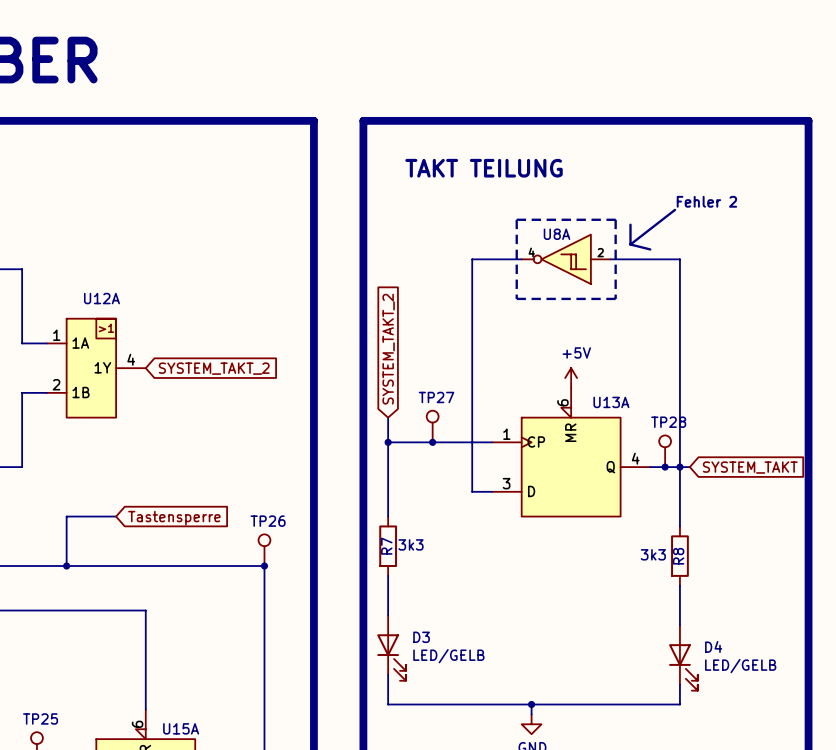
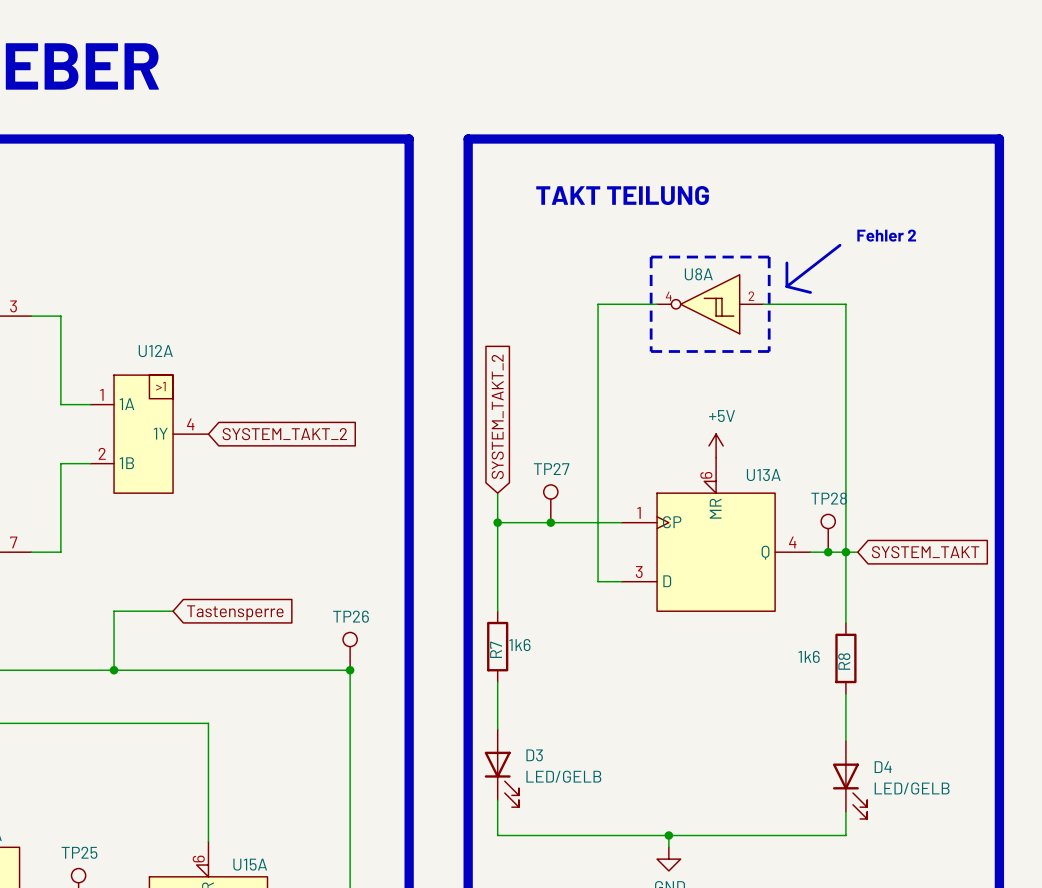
R7 value: 3k3 (411, 544) -> 1k6 (519, 645)
R8 value: 3k3 (653, 554) -> 1k6 (809, 656)

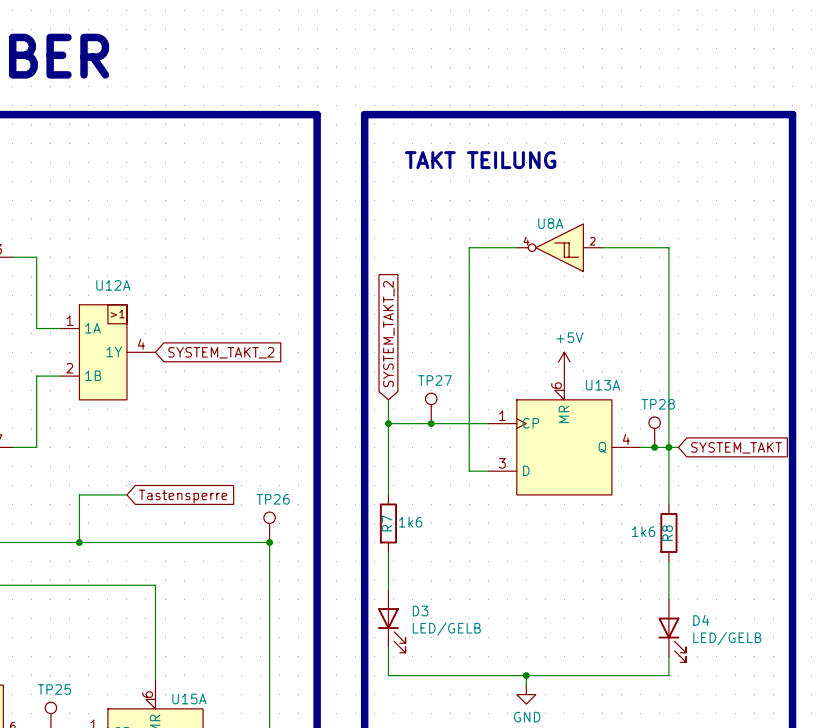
text: Fehler 2 (886, 235) -> none
line: (840, 245) (786, 286) -> none
line: (651, 257) (651, 351) (769, 351) (769, 257) (651, 257) -> none
line: (786, 262) (786, 286) -> none
line: (786, 286) (810, 292) -> none

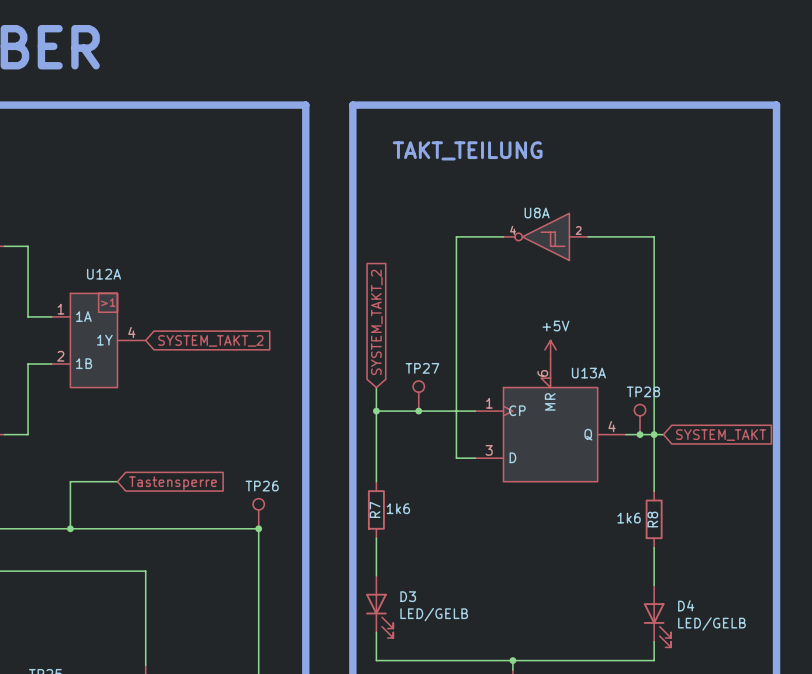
text: TAKT TEILUNG (480, 160) -> TAKT_TEILUNG (467, 150)

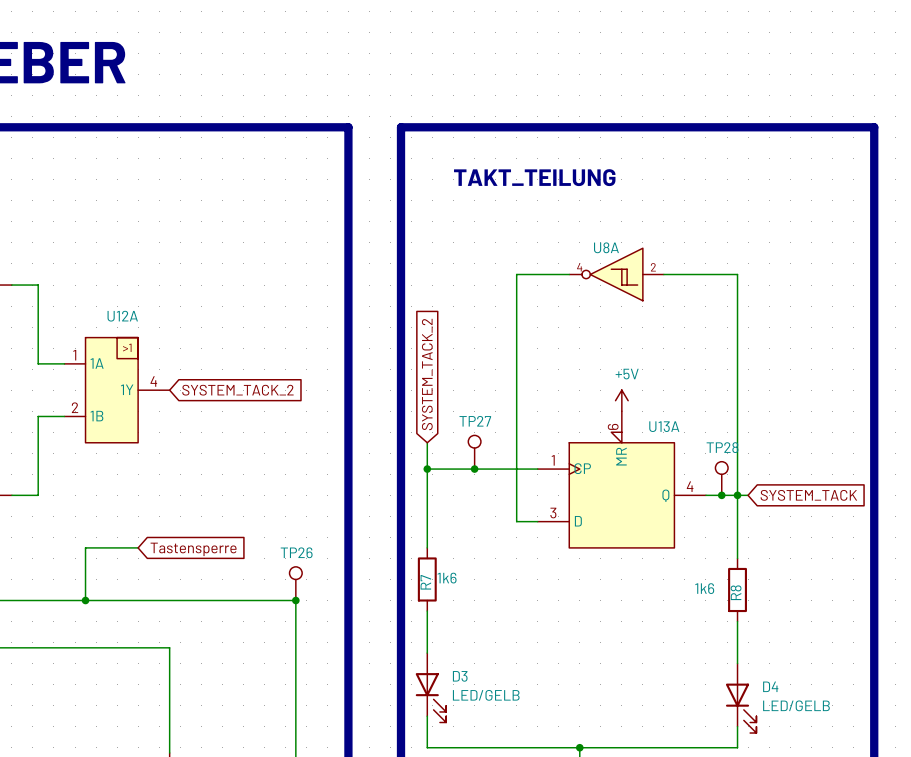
global label: SYSTEM_TAKT_2 (376, 322) -> SYSTEM_TACK_2 (427, 374)
global label: SYSTEM_TAKT_2 (210, 340) -> SYSTEM_TACK_2 (237, 390)
global label: SYSTEM_TAKT (721, 435) -> SYSTEM_TACK (808, 495)

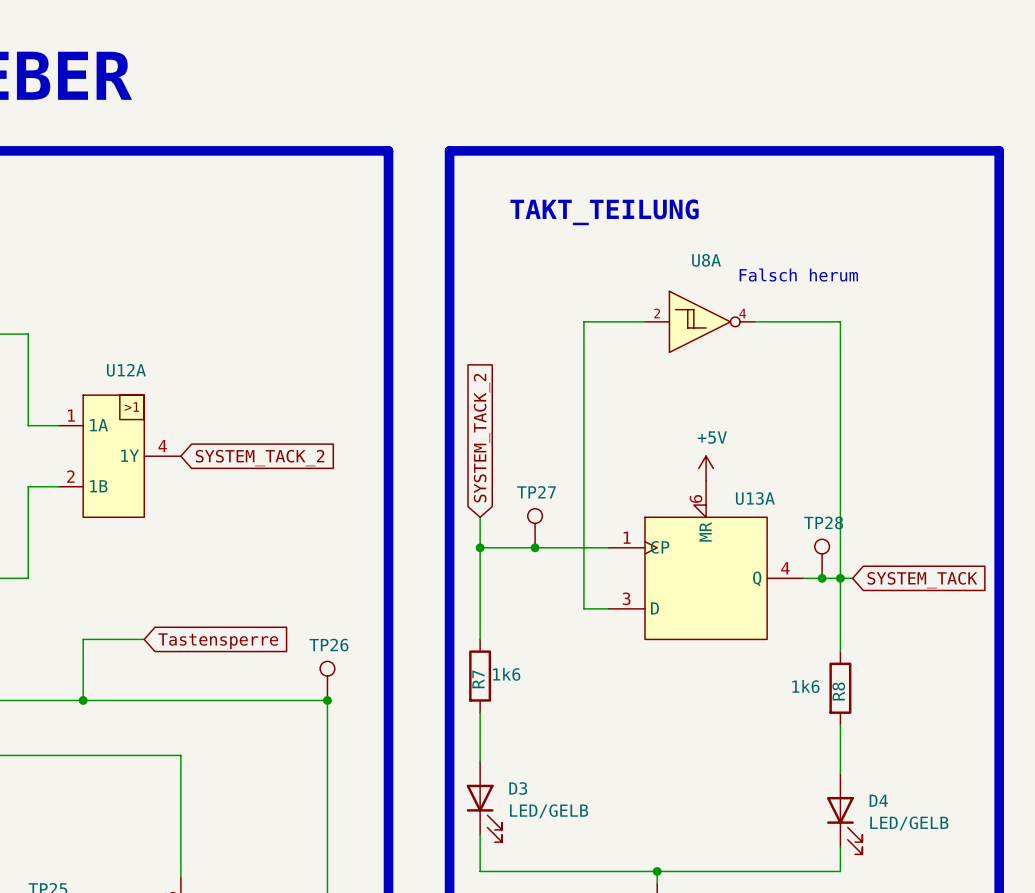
text: none -> Falsch herum (798, 275)
U8A name position: U8A (606, 247) -> U8A (706, 260)
U8A rotation: 0° (616, 274) -> 180° (699, 321)

